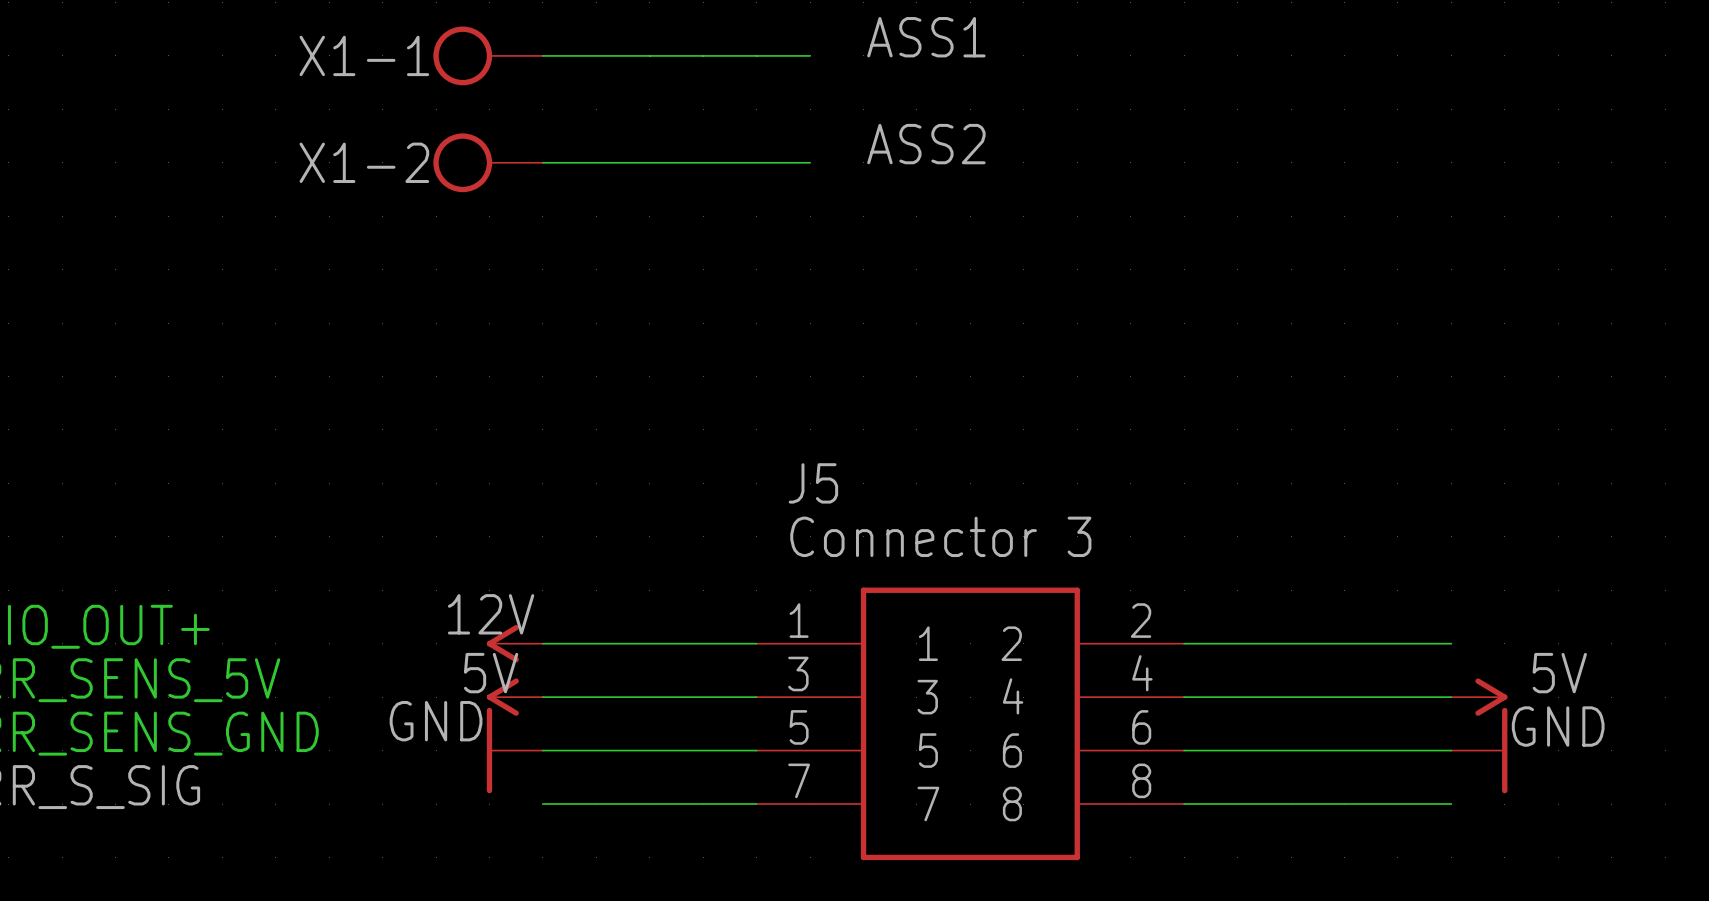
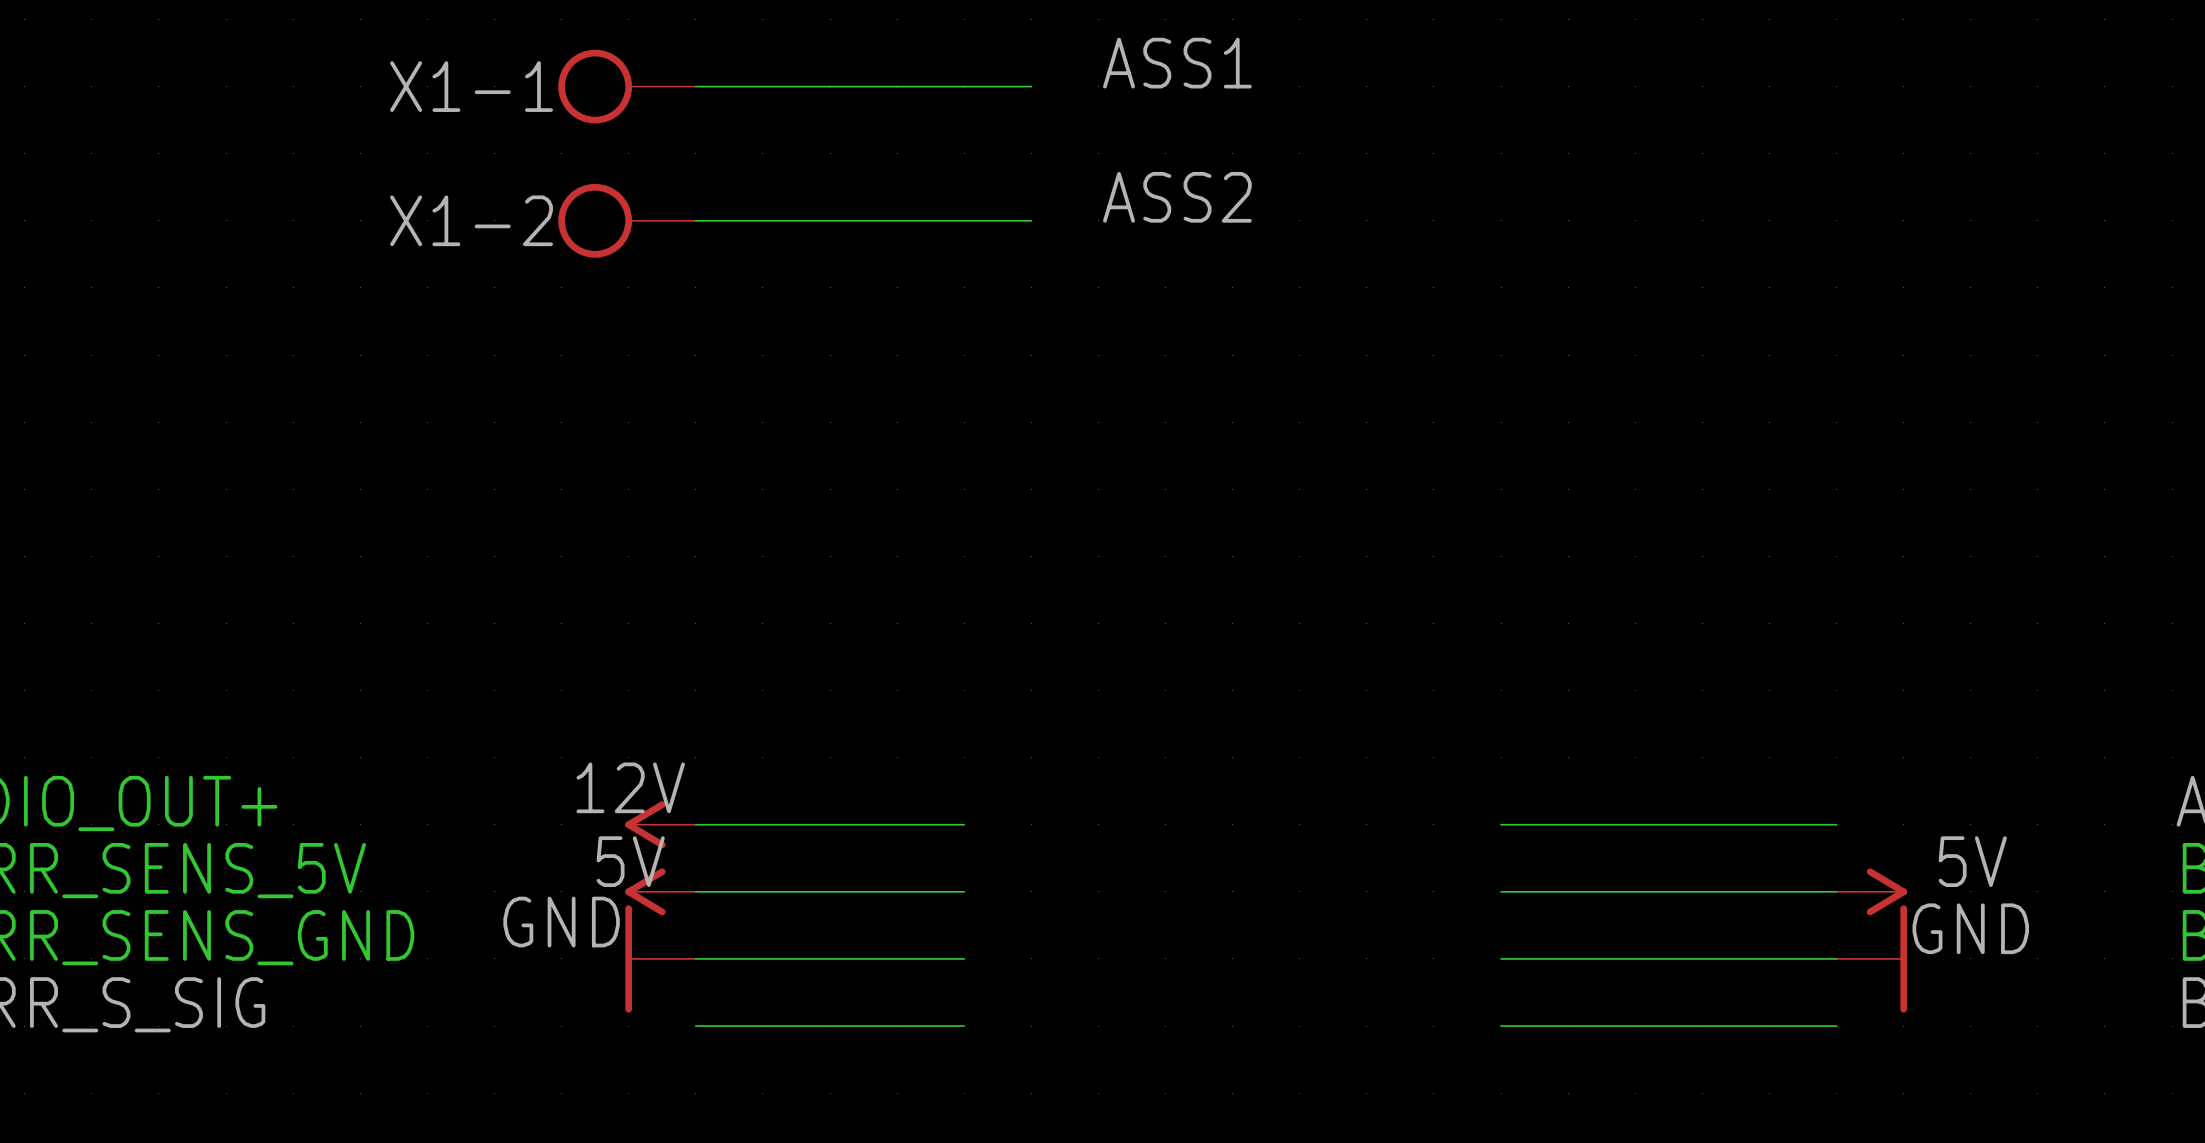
J5: Connector 3 (970, 723) -> none

